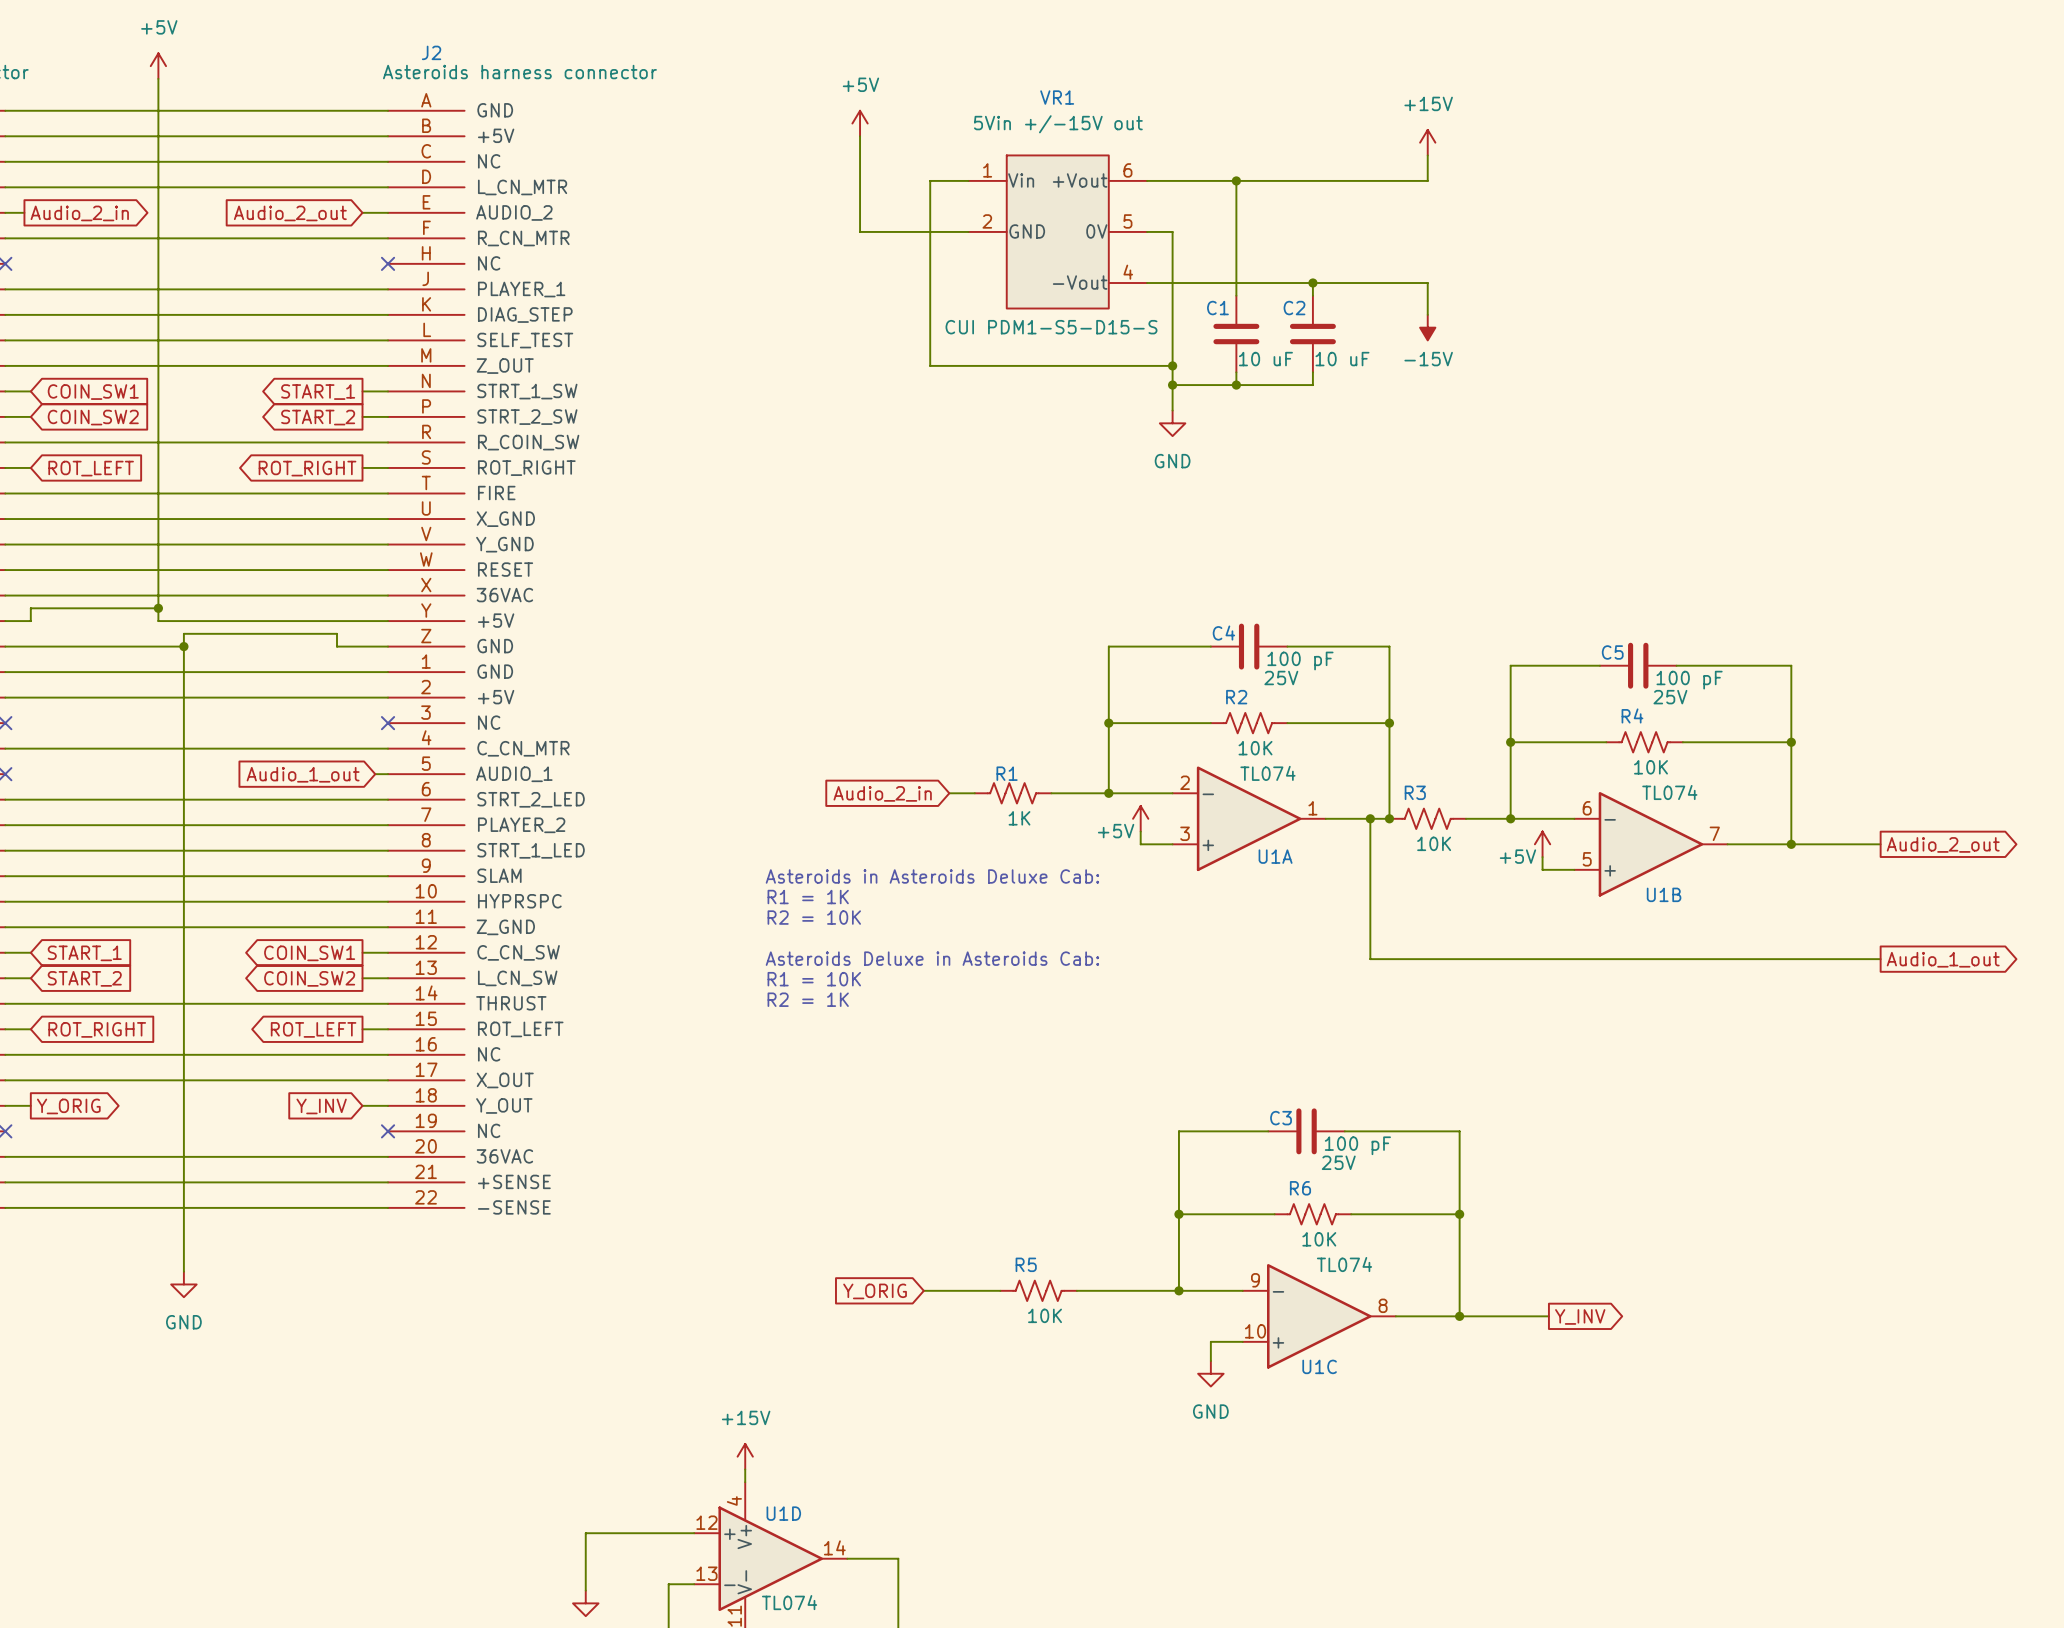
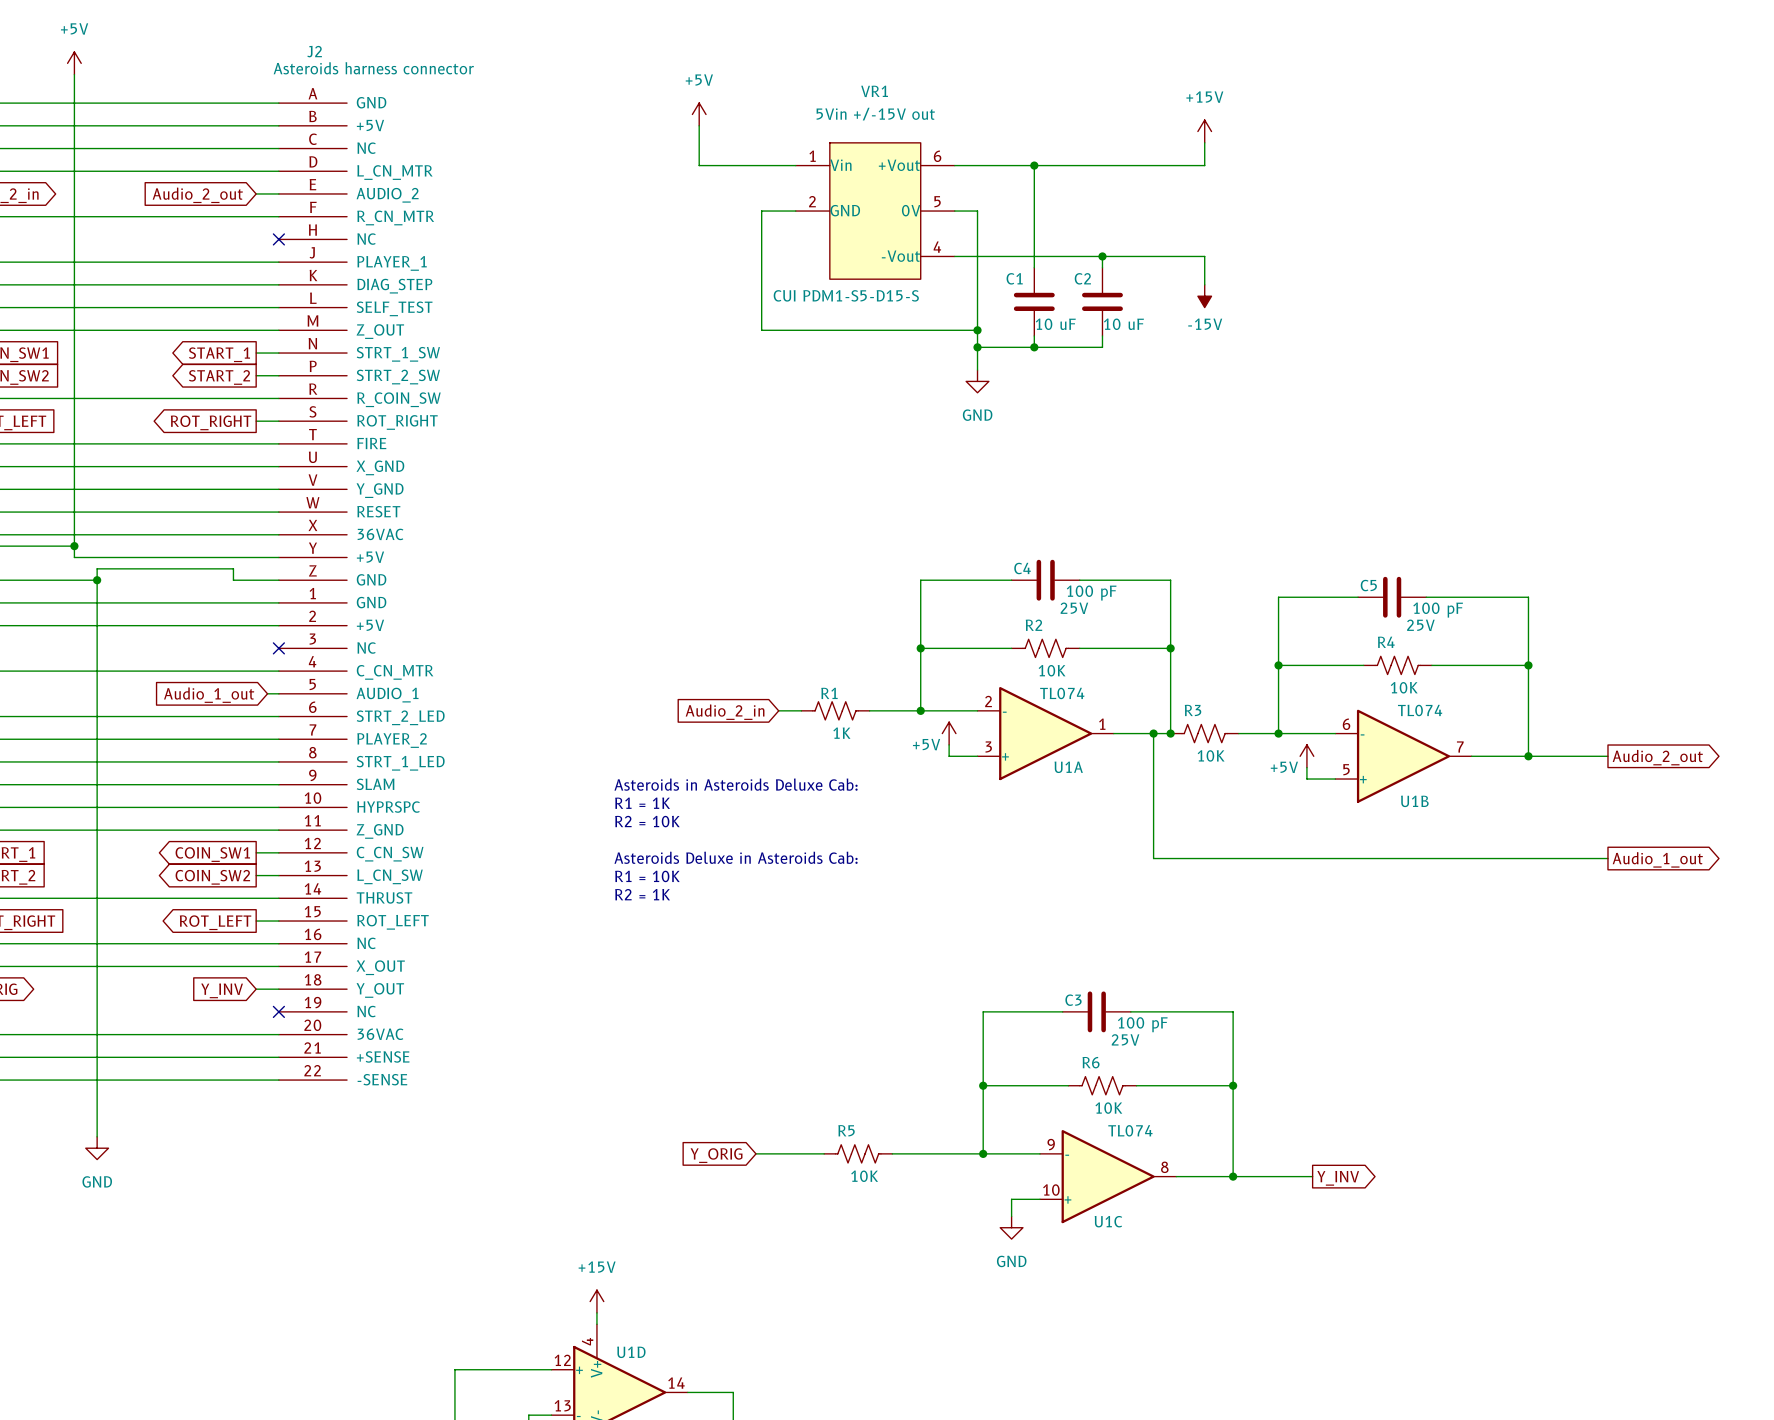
wire: (860, 180) (860, 231) (930, 231) (930, 180) -> (699, 165) (761, 165)

